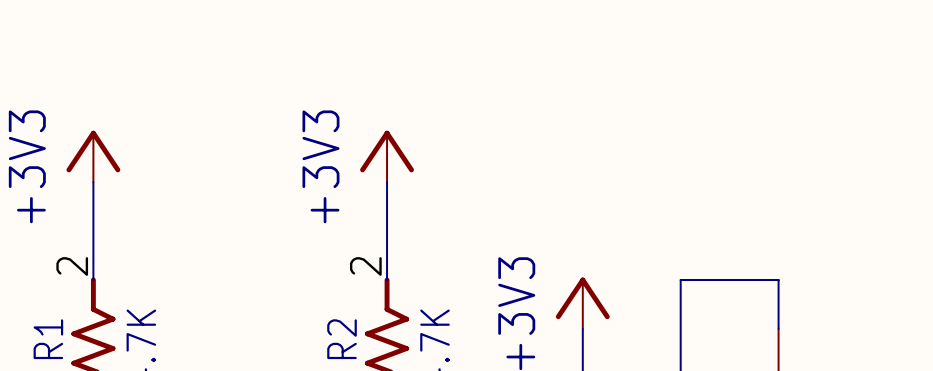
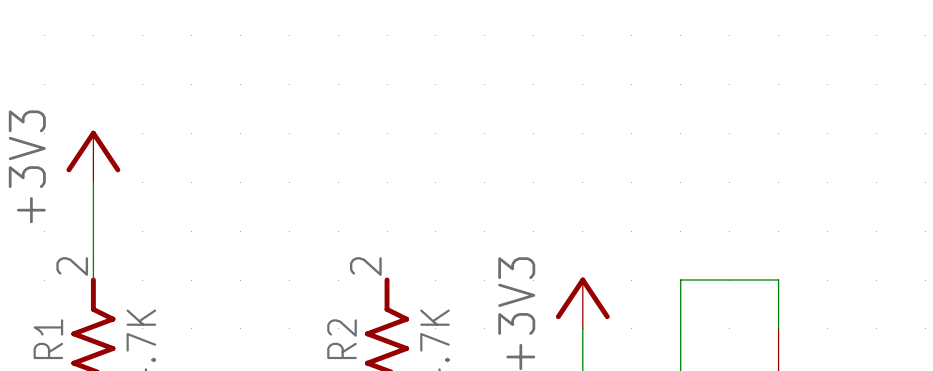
power symbol: +3V3 (387, 156) -> none
wire: (387, 182) (387, 280) -> none

